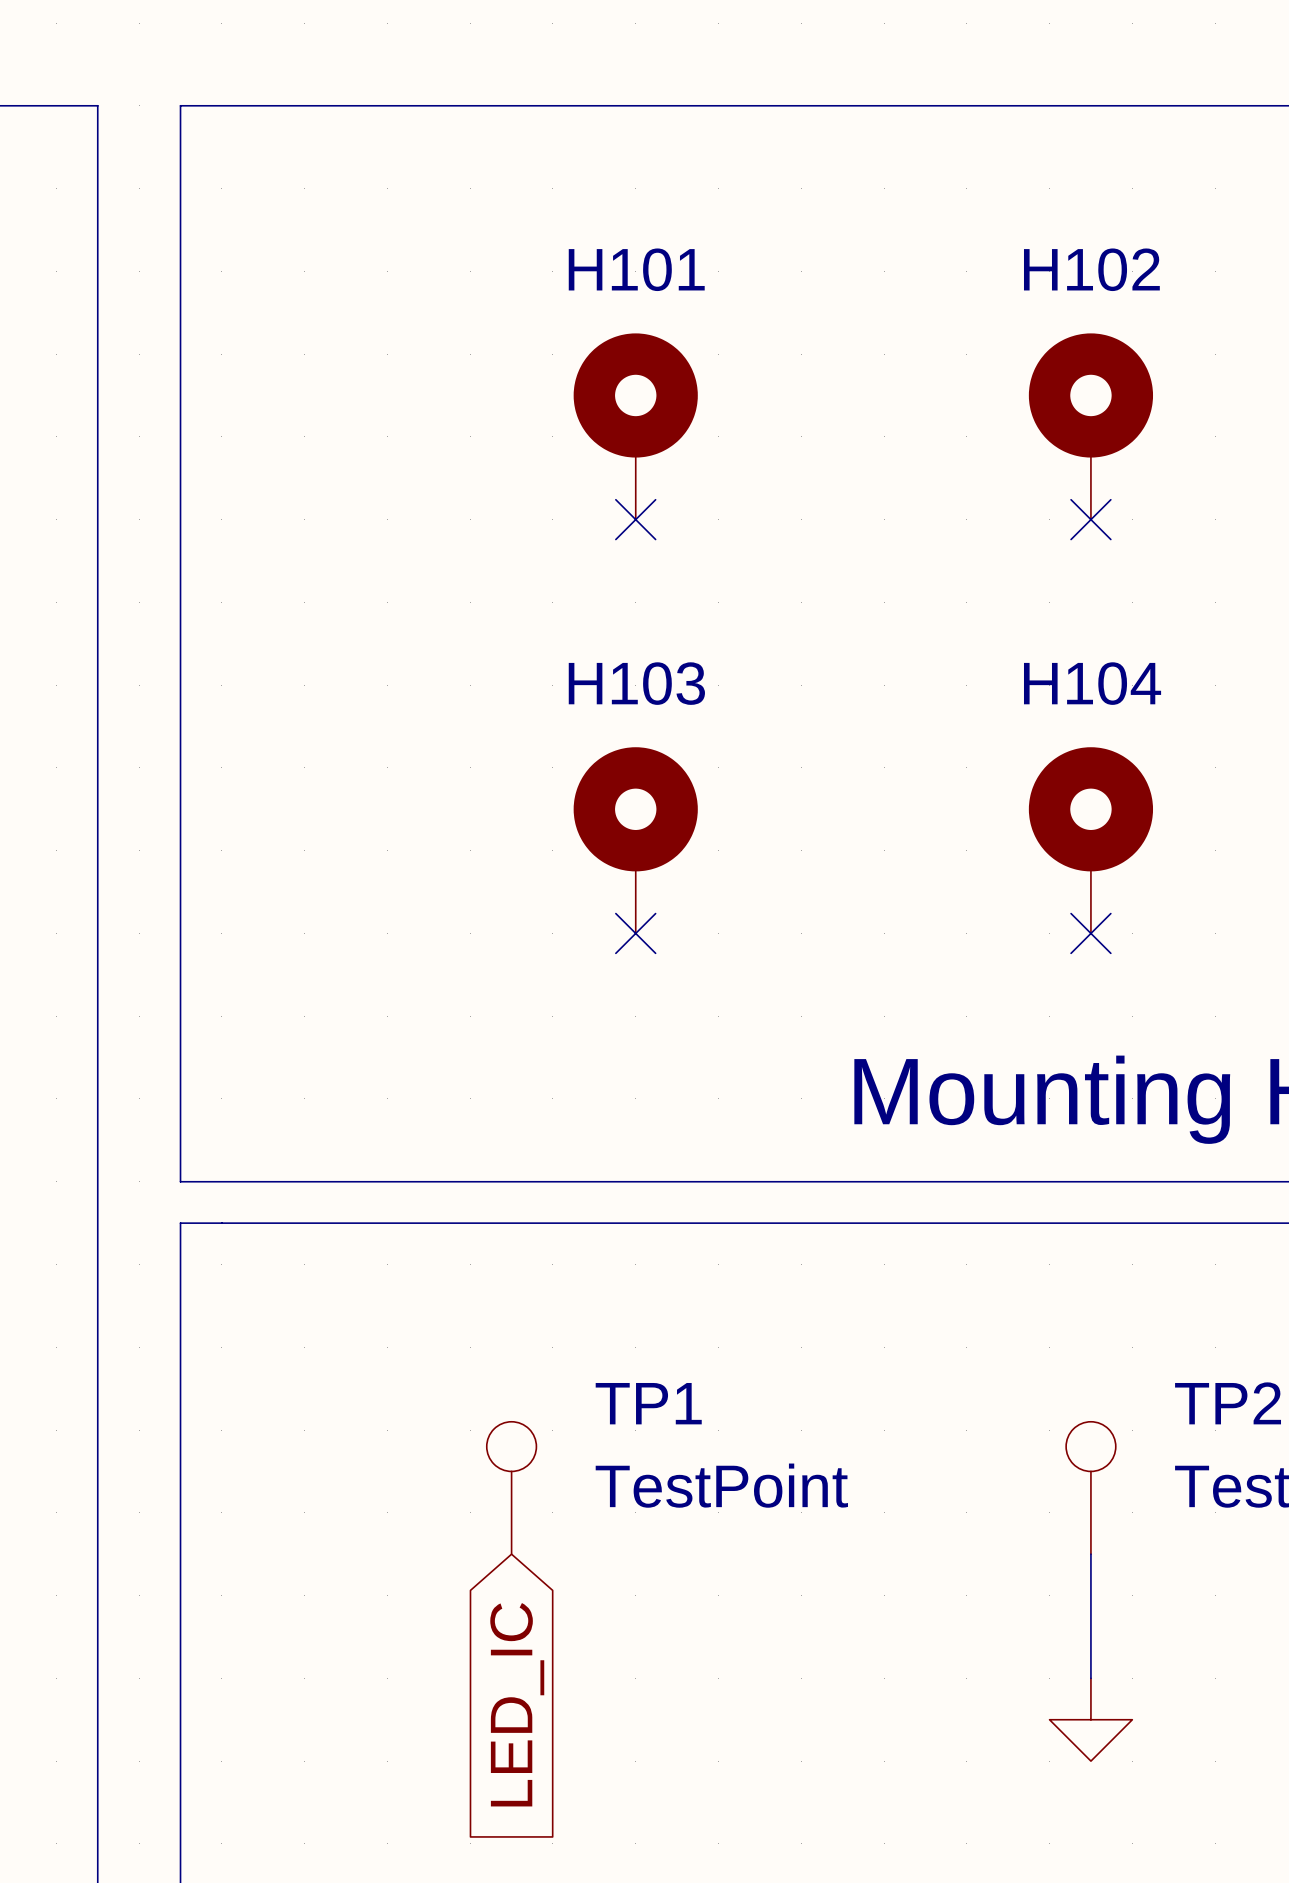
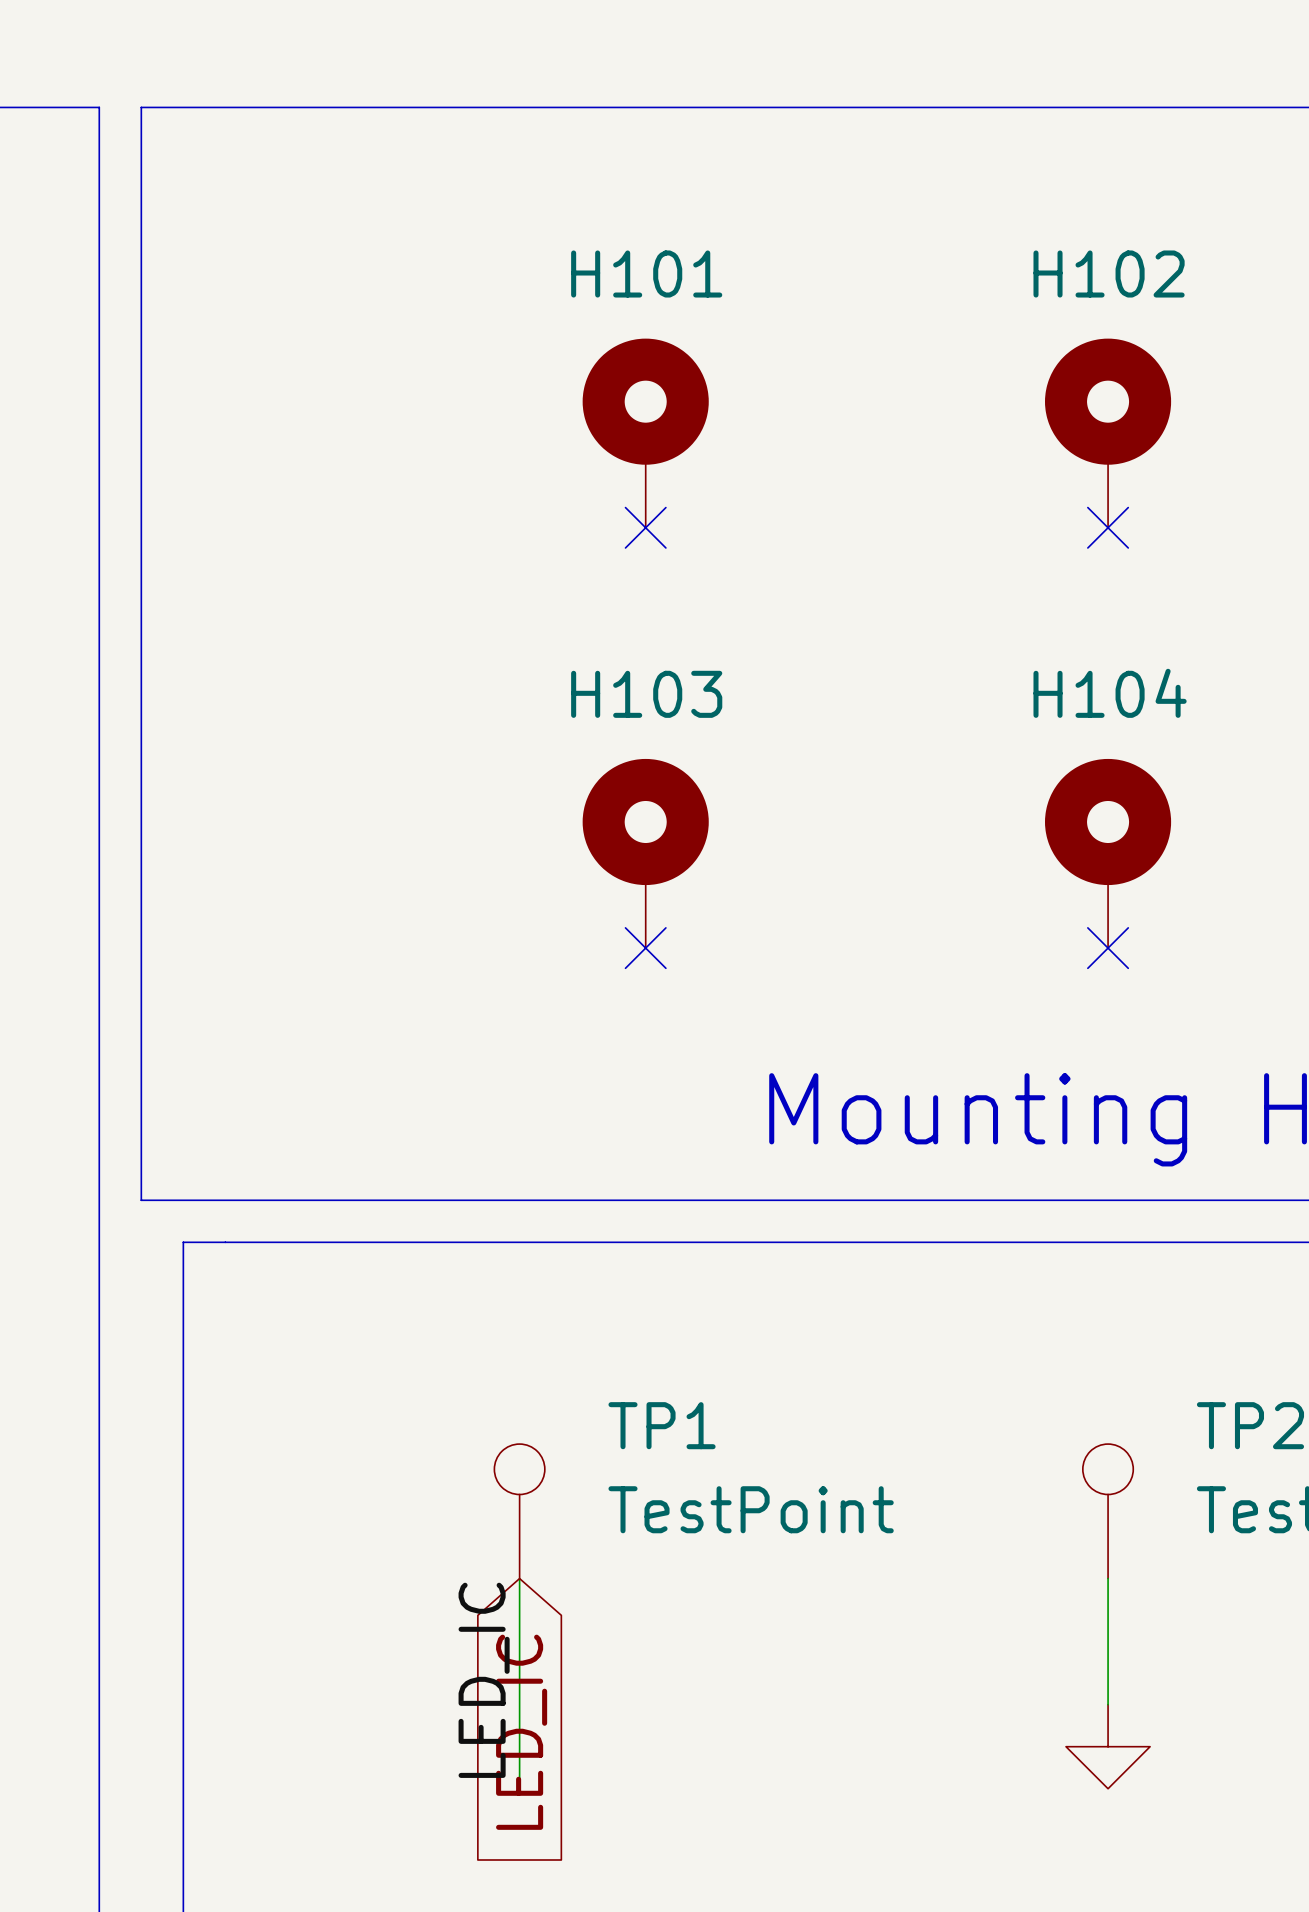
line: (180, 105) (180, 1181) -> (183, 107) (141, 107) (141, 1200) (183, 1200)
wire: none -> (519, 1578) (519, 1788)
label: none -> LED_IC (484, 1680)

